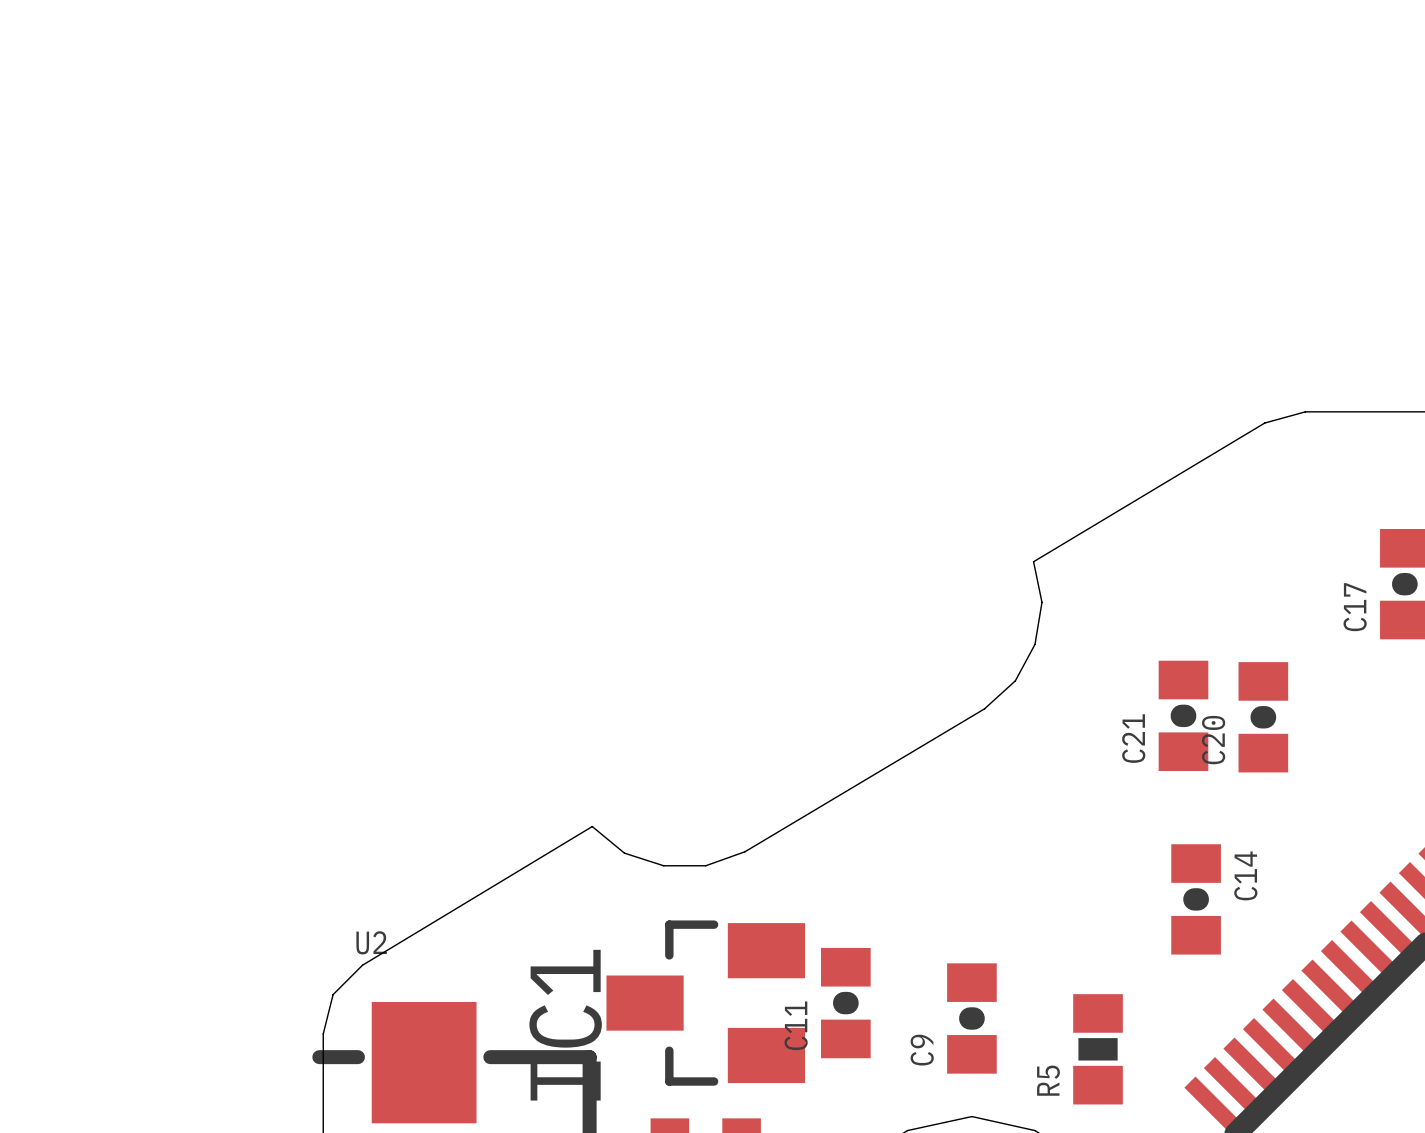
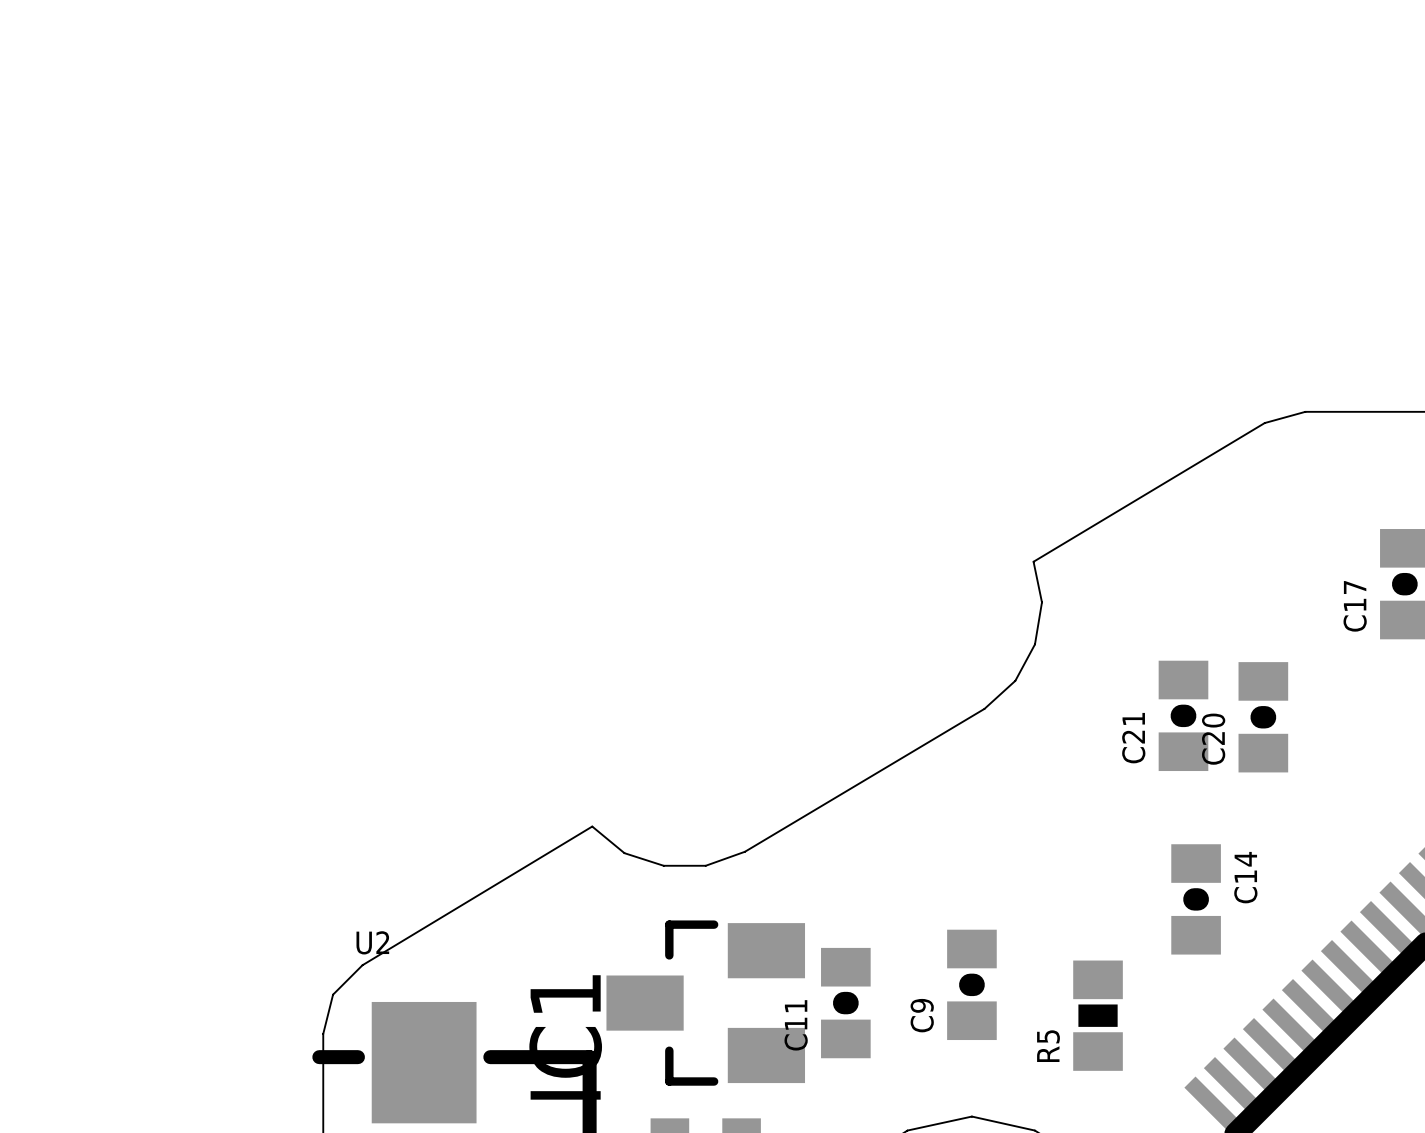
C9 position: (971, 1018) -> (971, 984)
R5 position: (1098, 1049) -> (1098, 1015)

